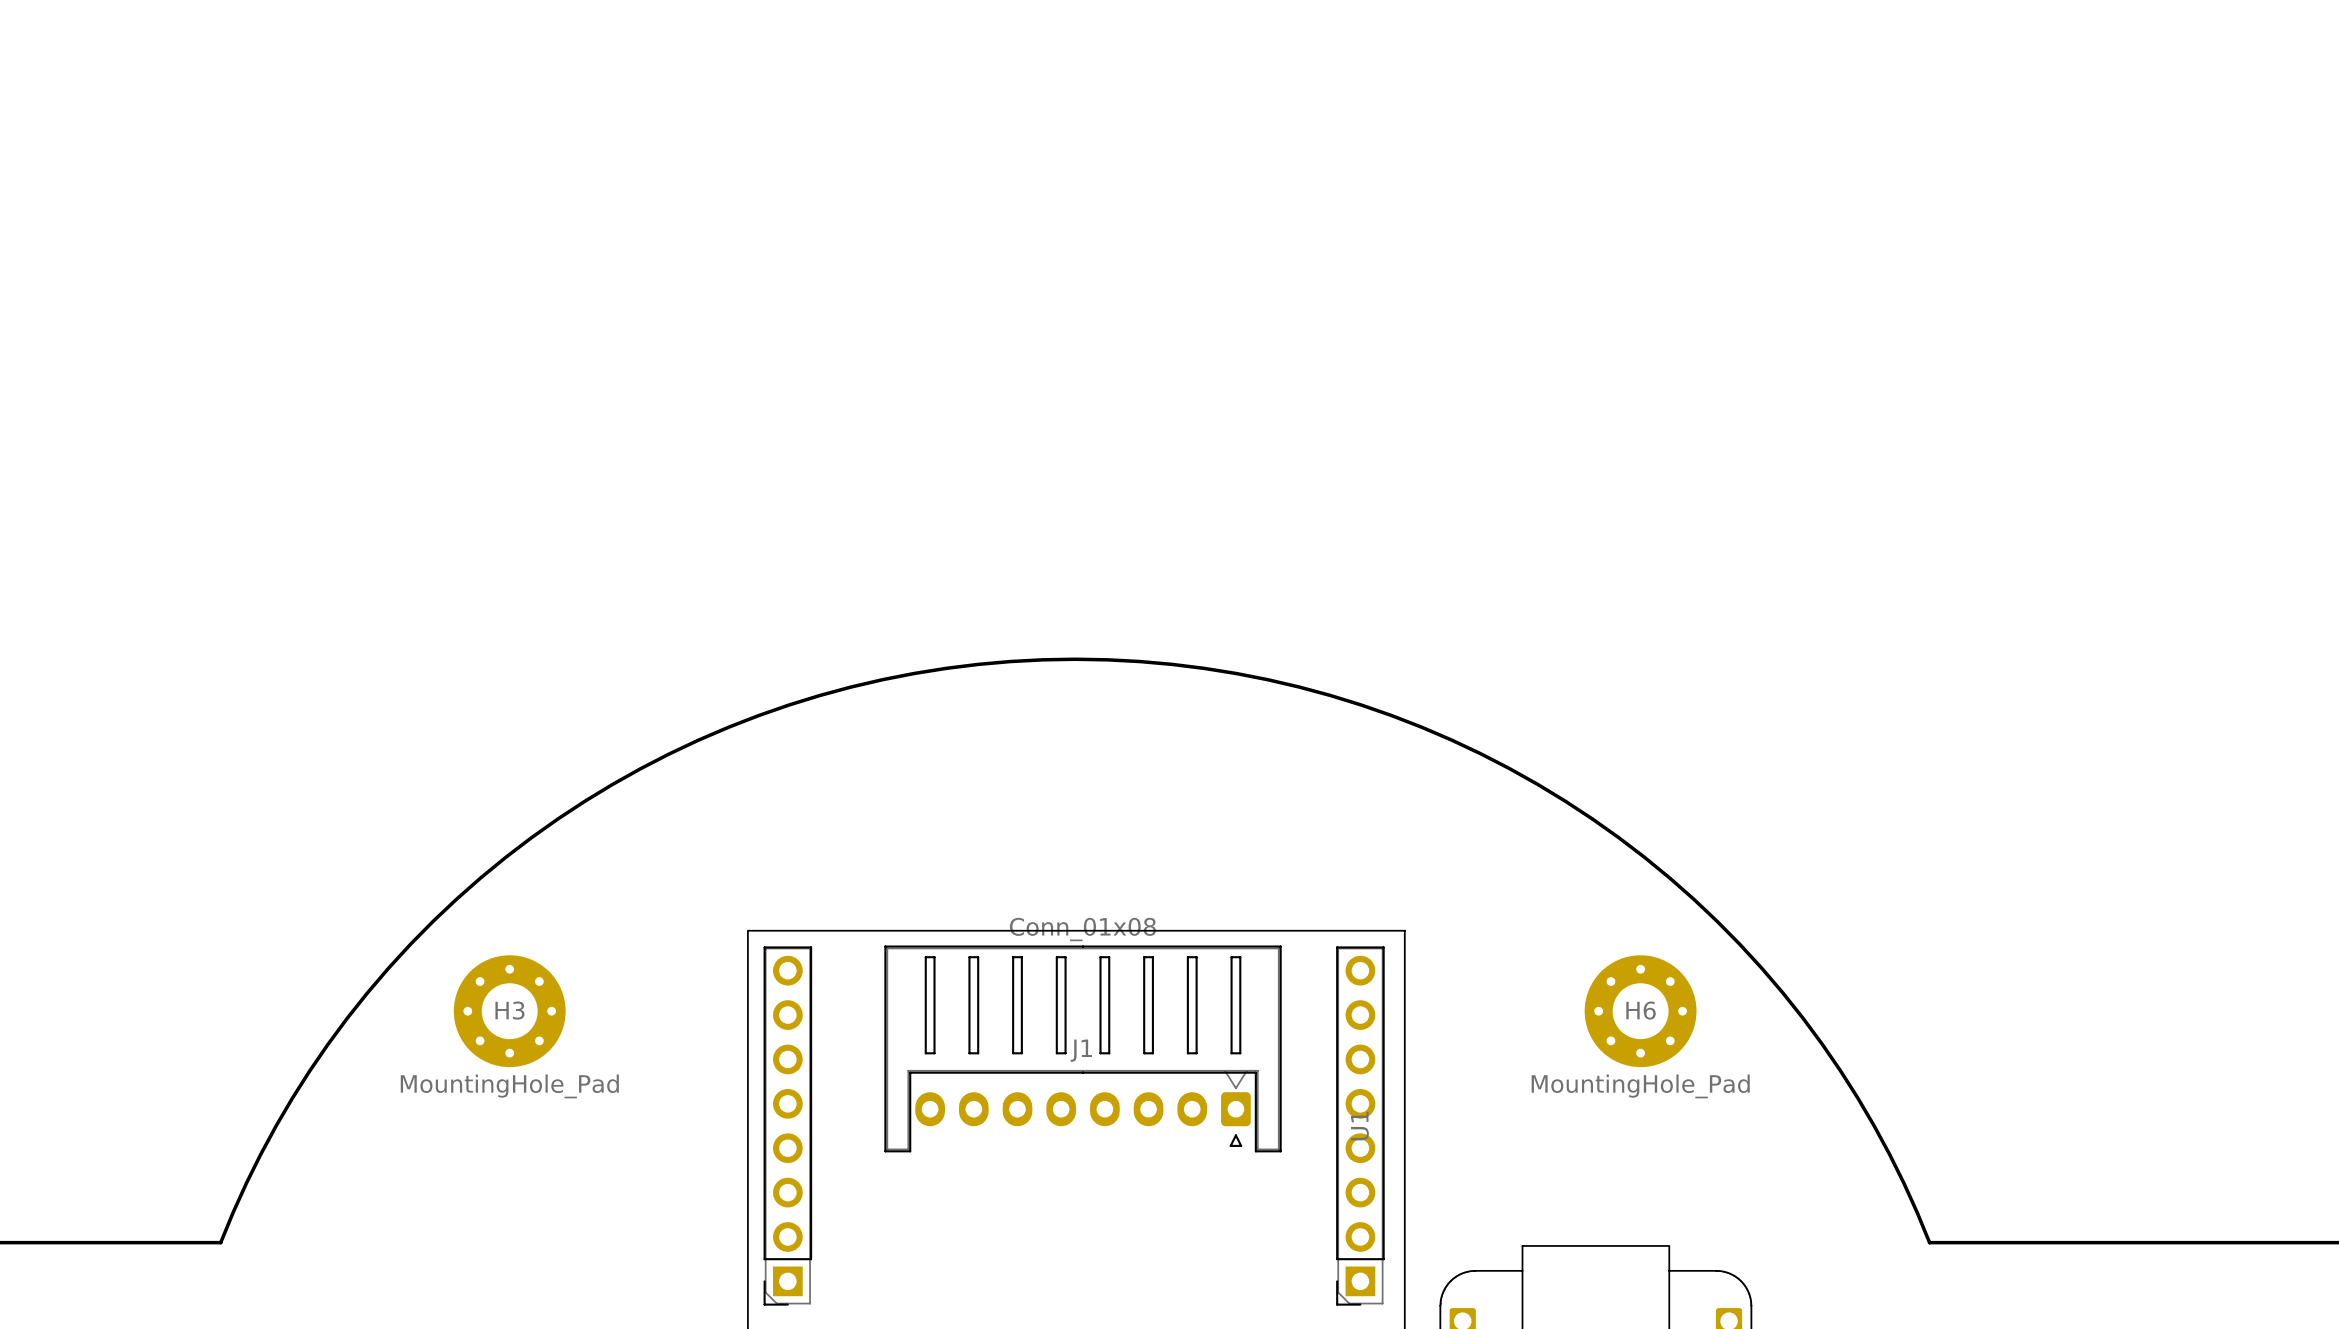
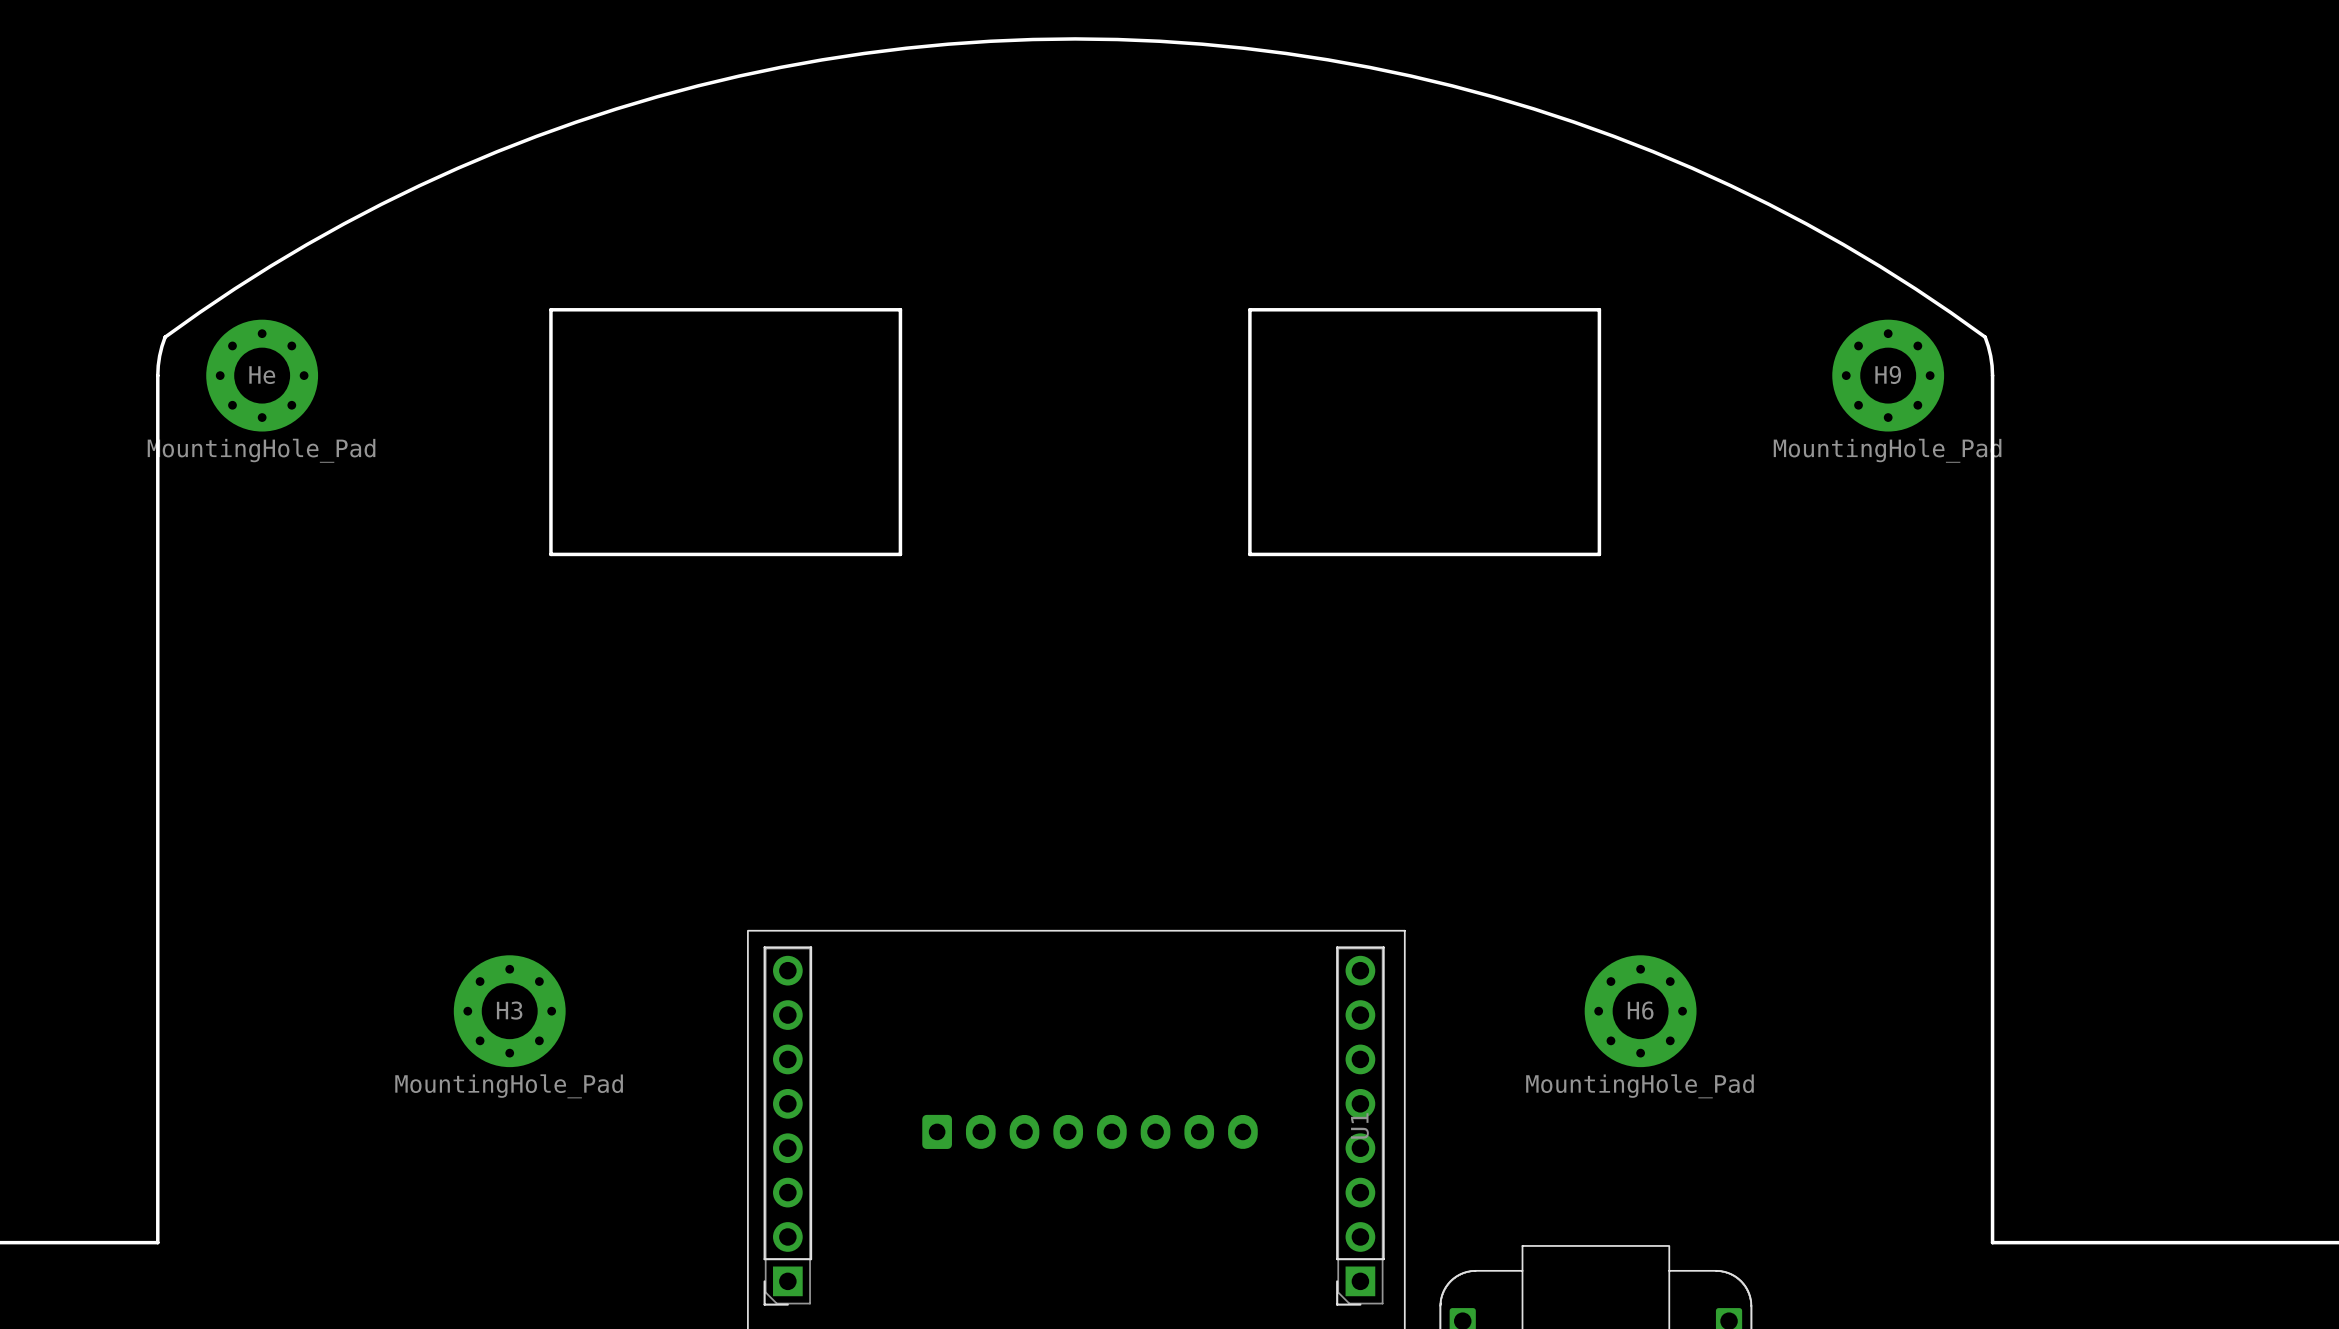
board edge: none -> (550, 309) (900, 309) (900, 554) (550, 554) (550, 309)
board edge: none -> (1249, 309) (1249, 554) (1599, 554) (1599, 309) (1249, 309)
He: none -> MountingHole_Pad (262, 375)
H9: none -> MountingHole_Pad (1888, 375)
J1 side: top (1083, 1048) -> bottom (1090, 1131)
board edge: (157, 1242) (220, 1242) (246, 1183) (276, 1125) (328, 1044) (367, 992) (433, 921) (480, 877) (531, 837) (584, 801) (640, 768) (698, 740) (758, 715) (819, 695) (882, 679) (946, 668) (1010, 661) (1075, 659) (1139, 661) (1204, 668) (1267, 679) (1330, 695) (1391, 715) (1451, 740) (1509, 768) (1565, 801) (1618, 837) (1669, 877) (1739, 944) (1782, 992) (1822, 1044) (1857, 1098) (1903, 1183) (1929, 1242) (1992, 1242) -> (157, 1242) (157, 375) (159, 356) (165, 337) (234, 288) (343, 223) (457, 168) (576, 122) (697, 85) (822, 59) (948, 44) (1075, 38) (1202, 44) (1328, 59) (1452, 85) (1574, 122) (1692, 168) (1768, 204) (1879, 266) (1985, 337) (1990, 356) (1992, 375) (1992, 1242)

